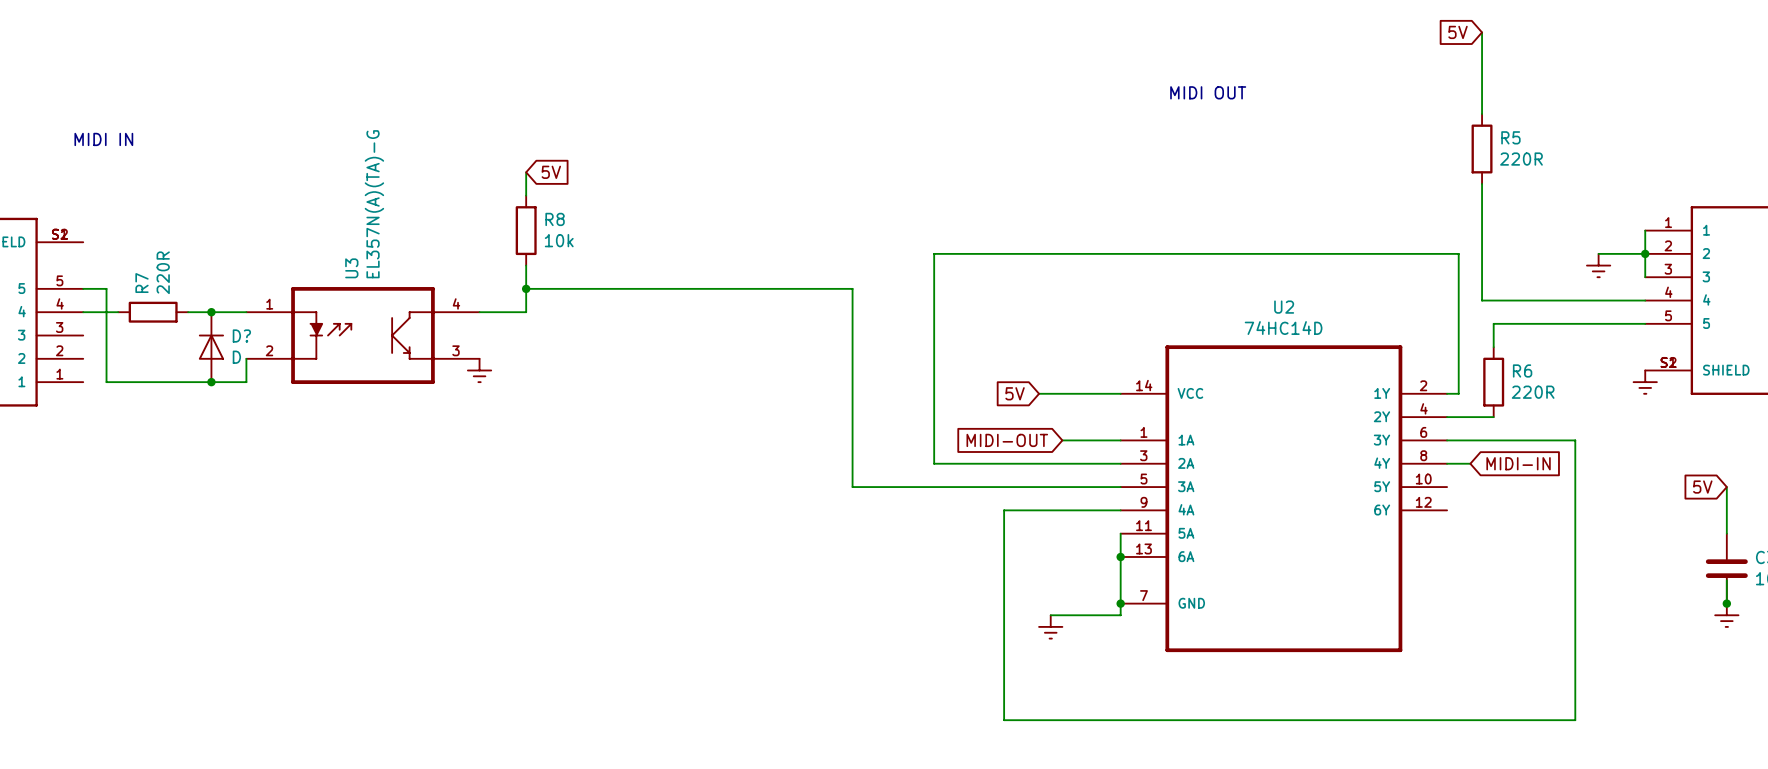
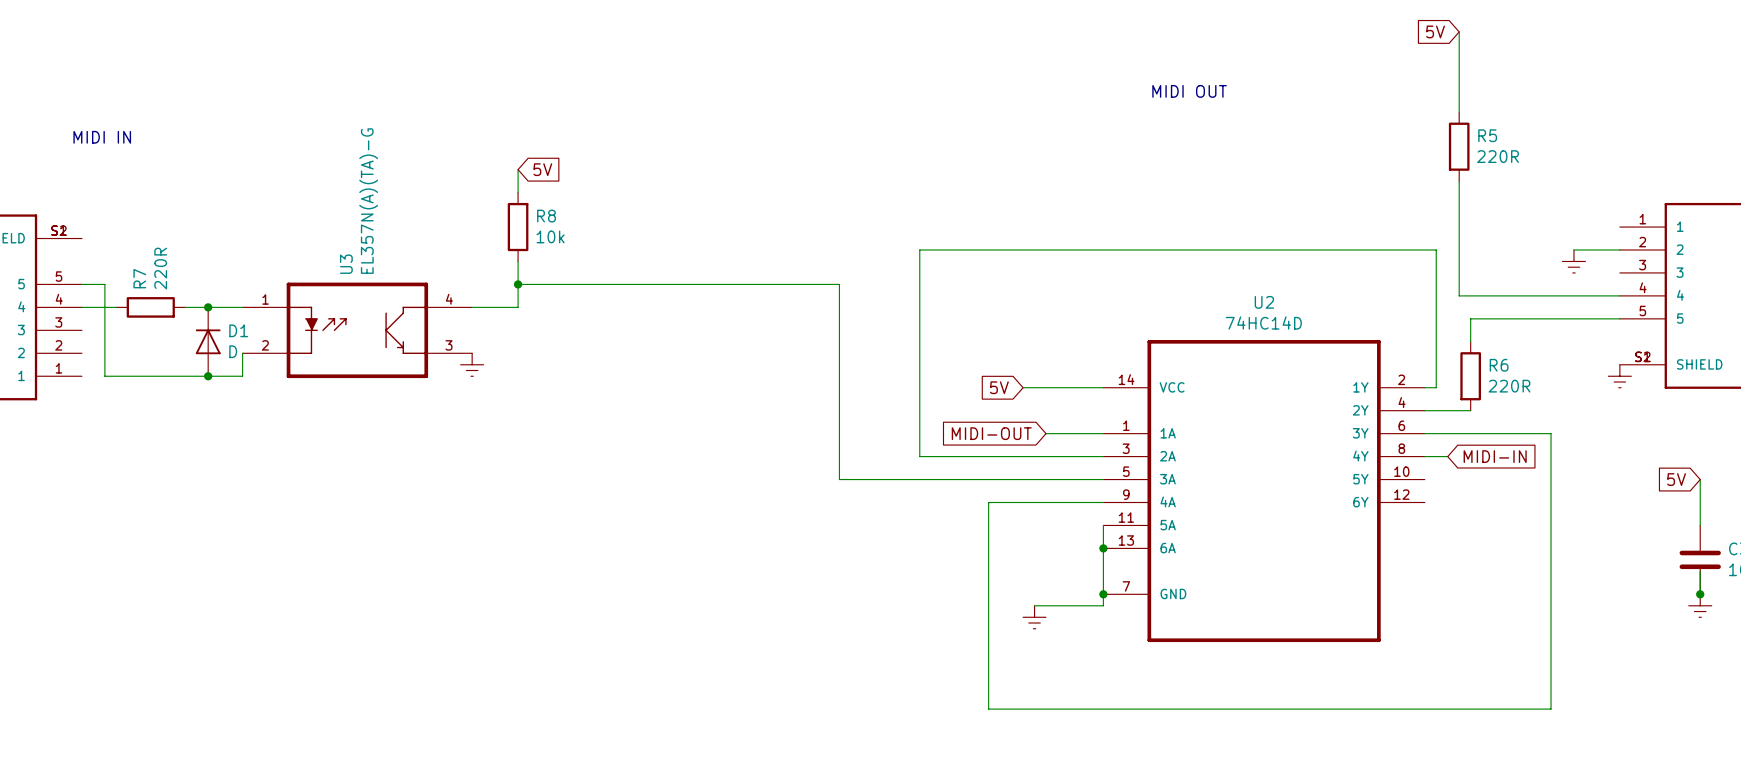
wire: (1645, 230) (1645, 277) -> none
junction: (1645, 253) -> none
D? name: D? (241, 336) -> D1 (238, 330)

